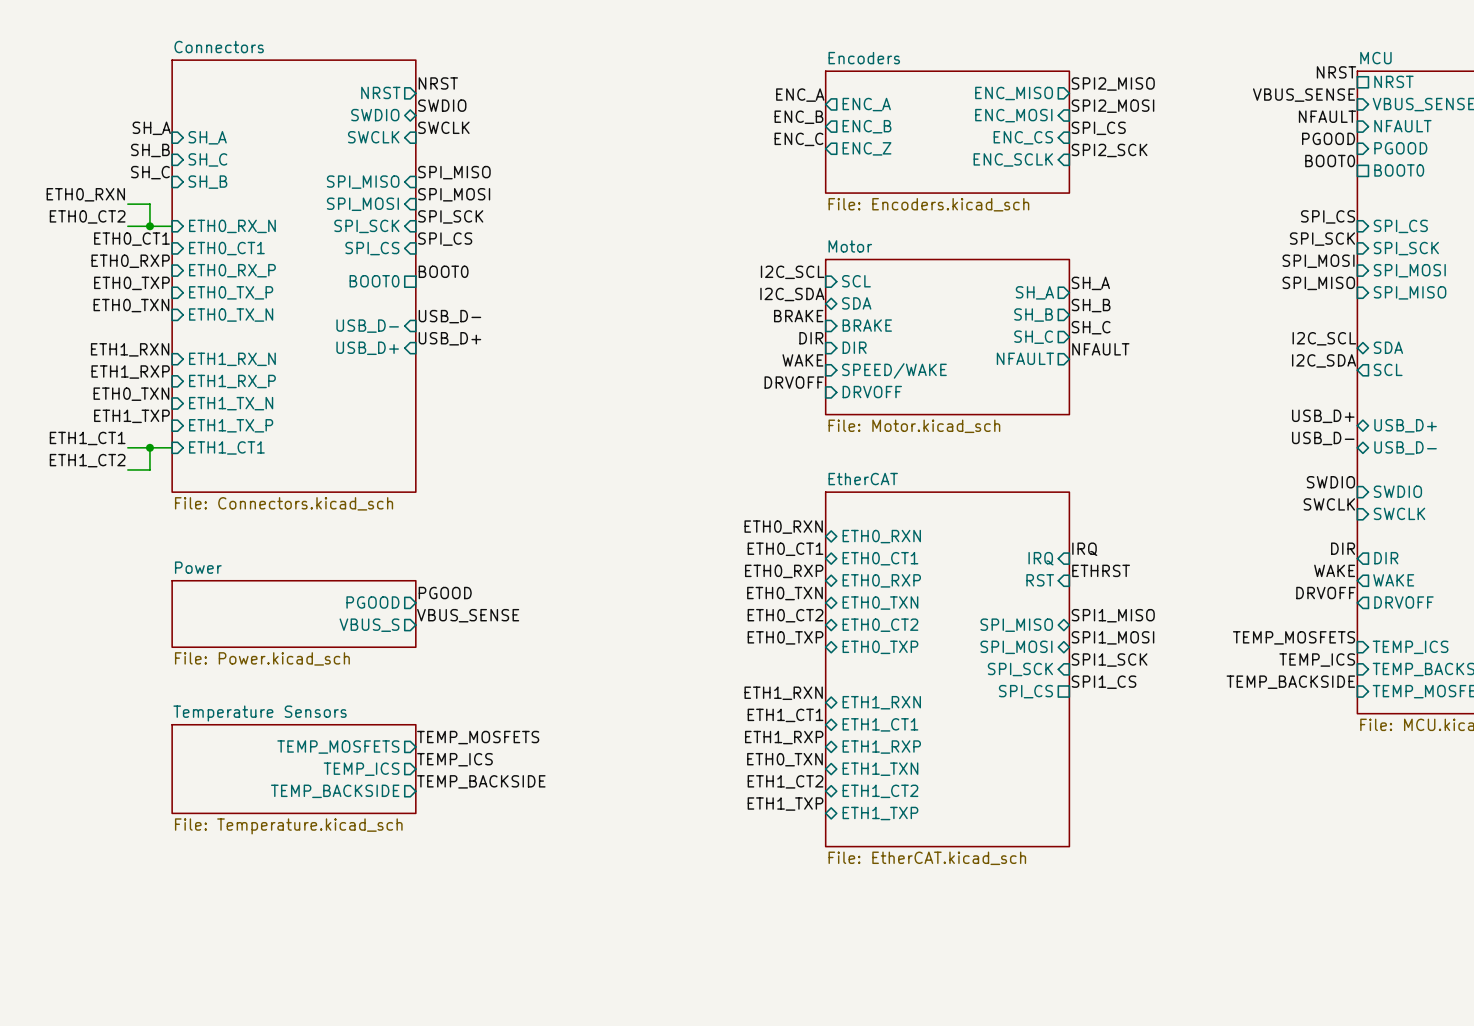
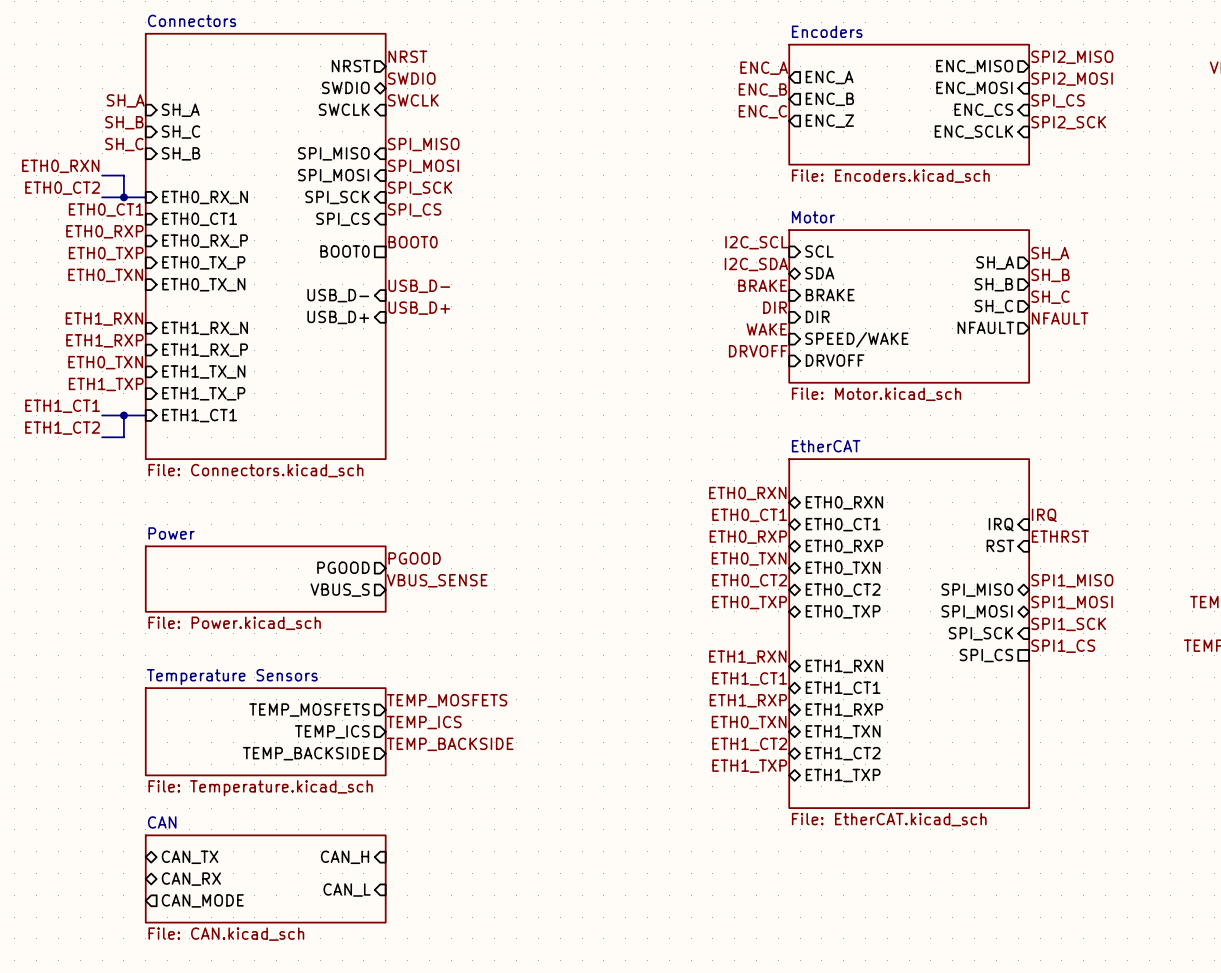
sheet pin: none -> CAN_TX (190, 857)
sheet pin: none -> CAN_H (345, 857)
sheet pin: none -> CAN_RX (191, 879)
sheet CAN: none -> File: CAN.kicad_sch (265, 878)
sheet pin: none -> CAN_L (347, 890)
sheet pin: none -> CAN_MODE (202, 900)

